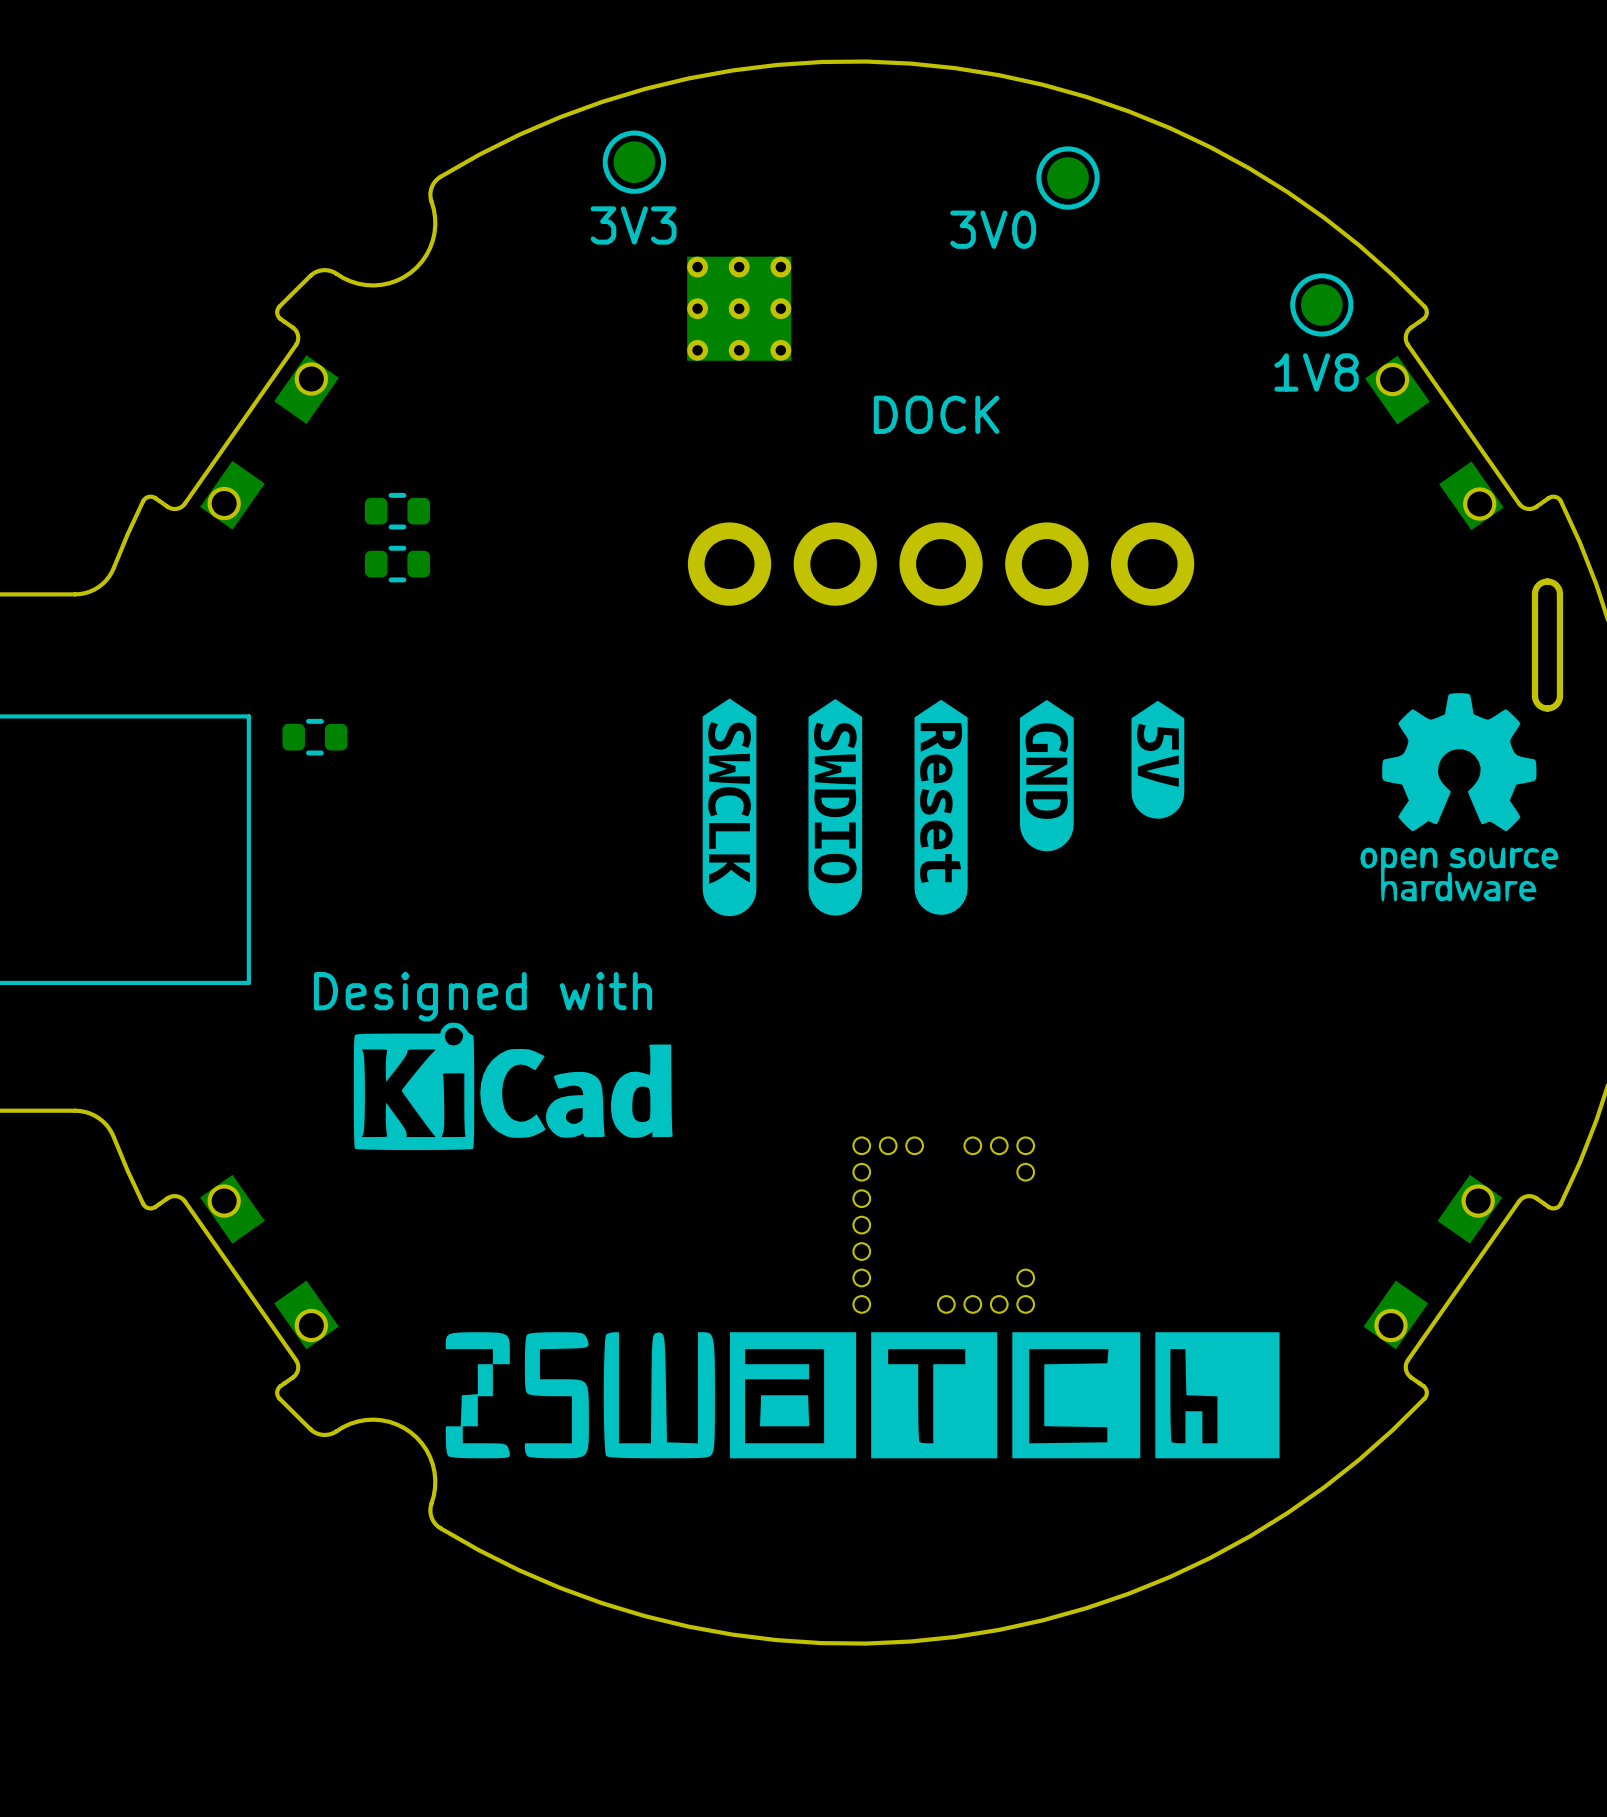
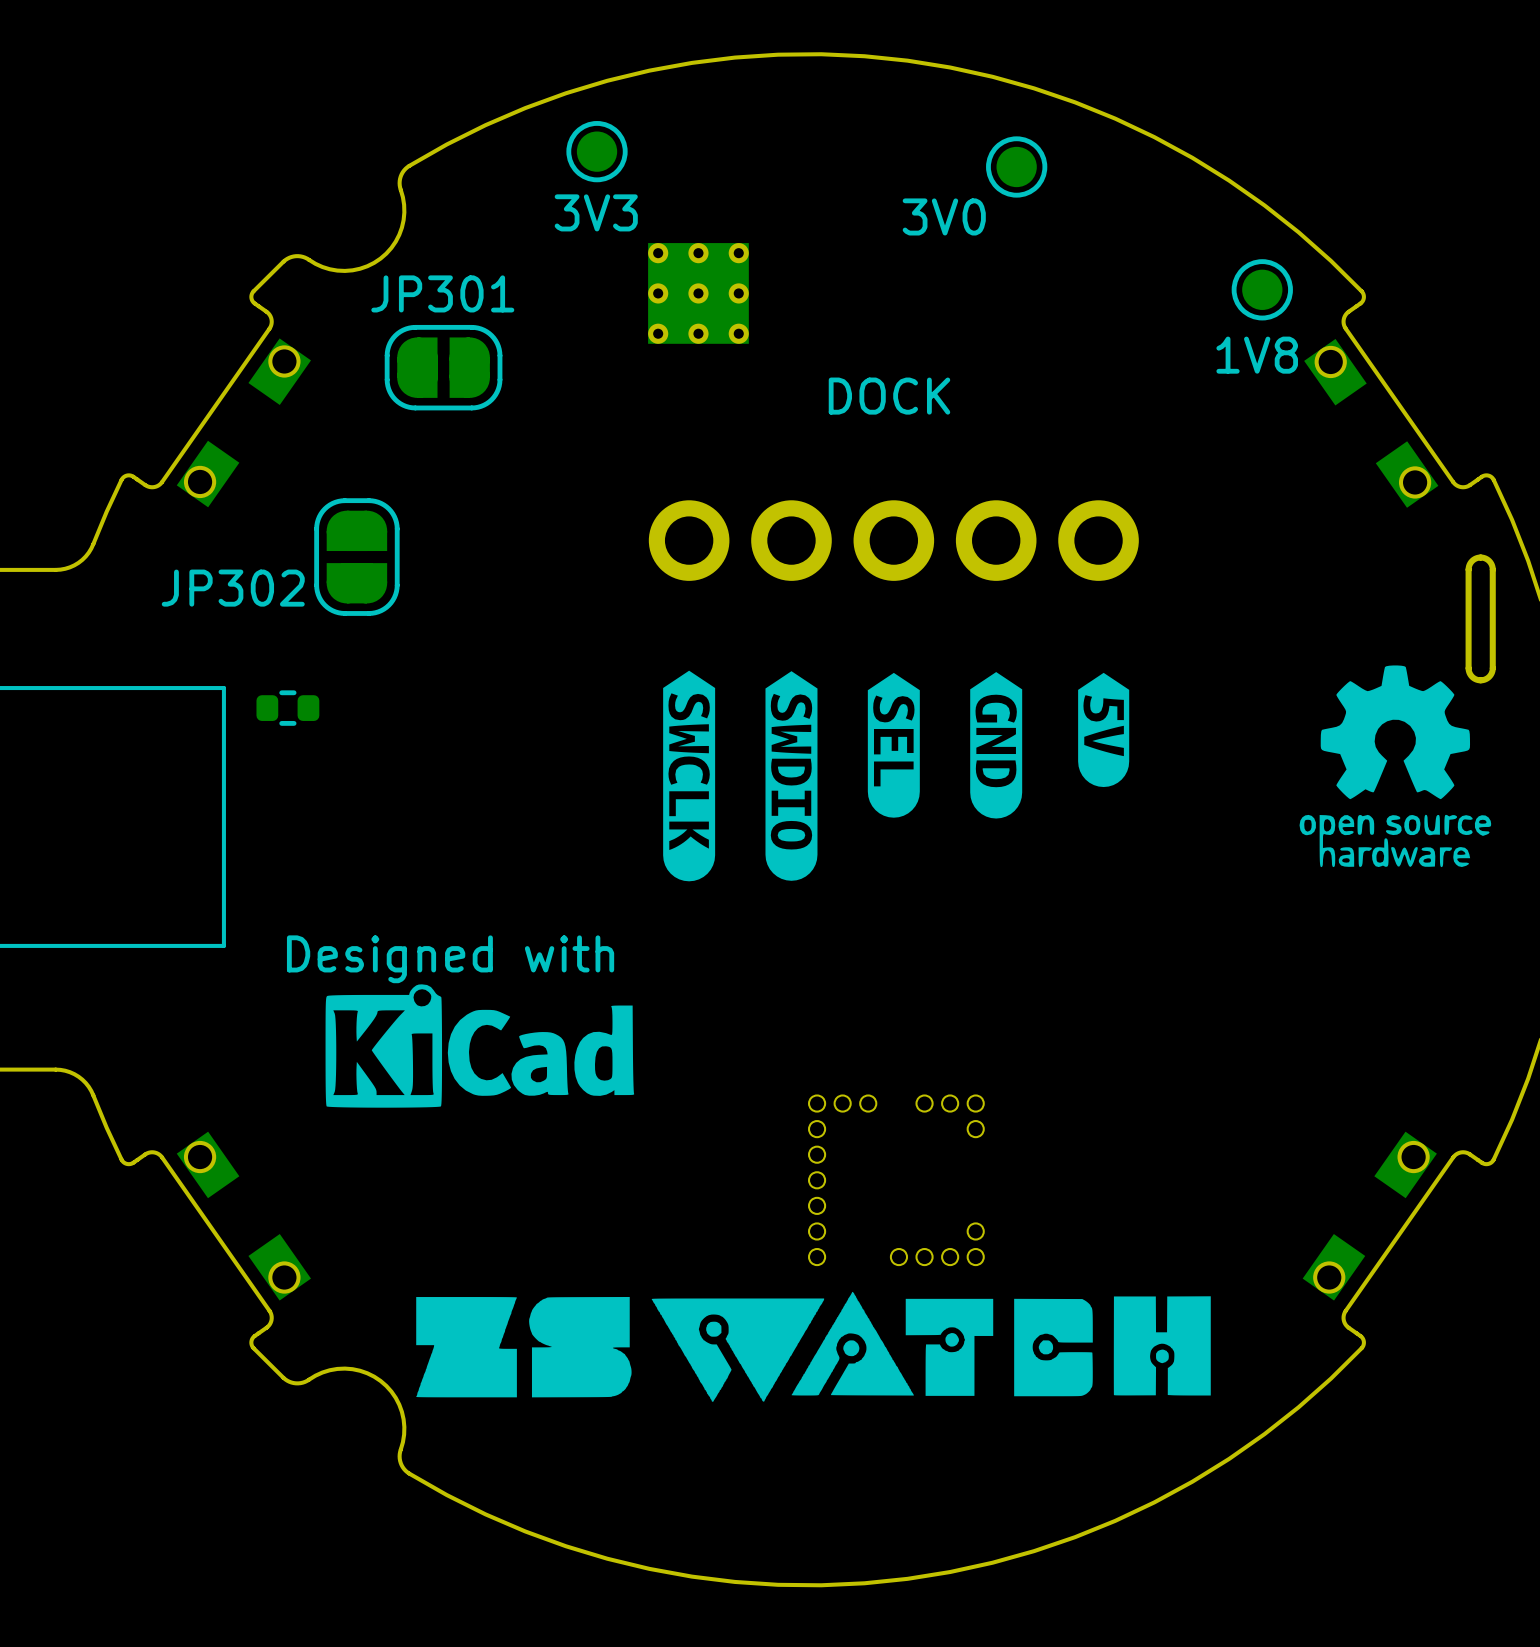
JP301: none -> (443, 367)
part: (397, 511) -> none
part: (397, 564) -> none
JP302: none -> (356, 557)
drawing shape: [914, 699, 968, 915] -> [867, 672, 920, 818]
drawing shape: [445, 1332, 1280, 1459] -> [416, 1291, 1211, 1402]

